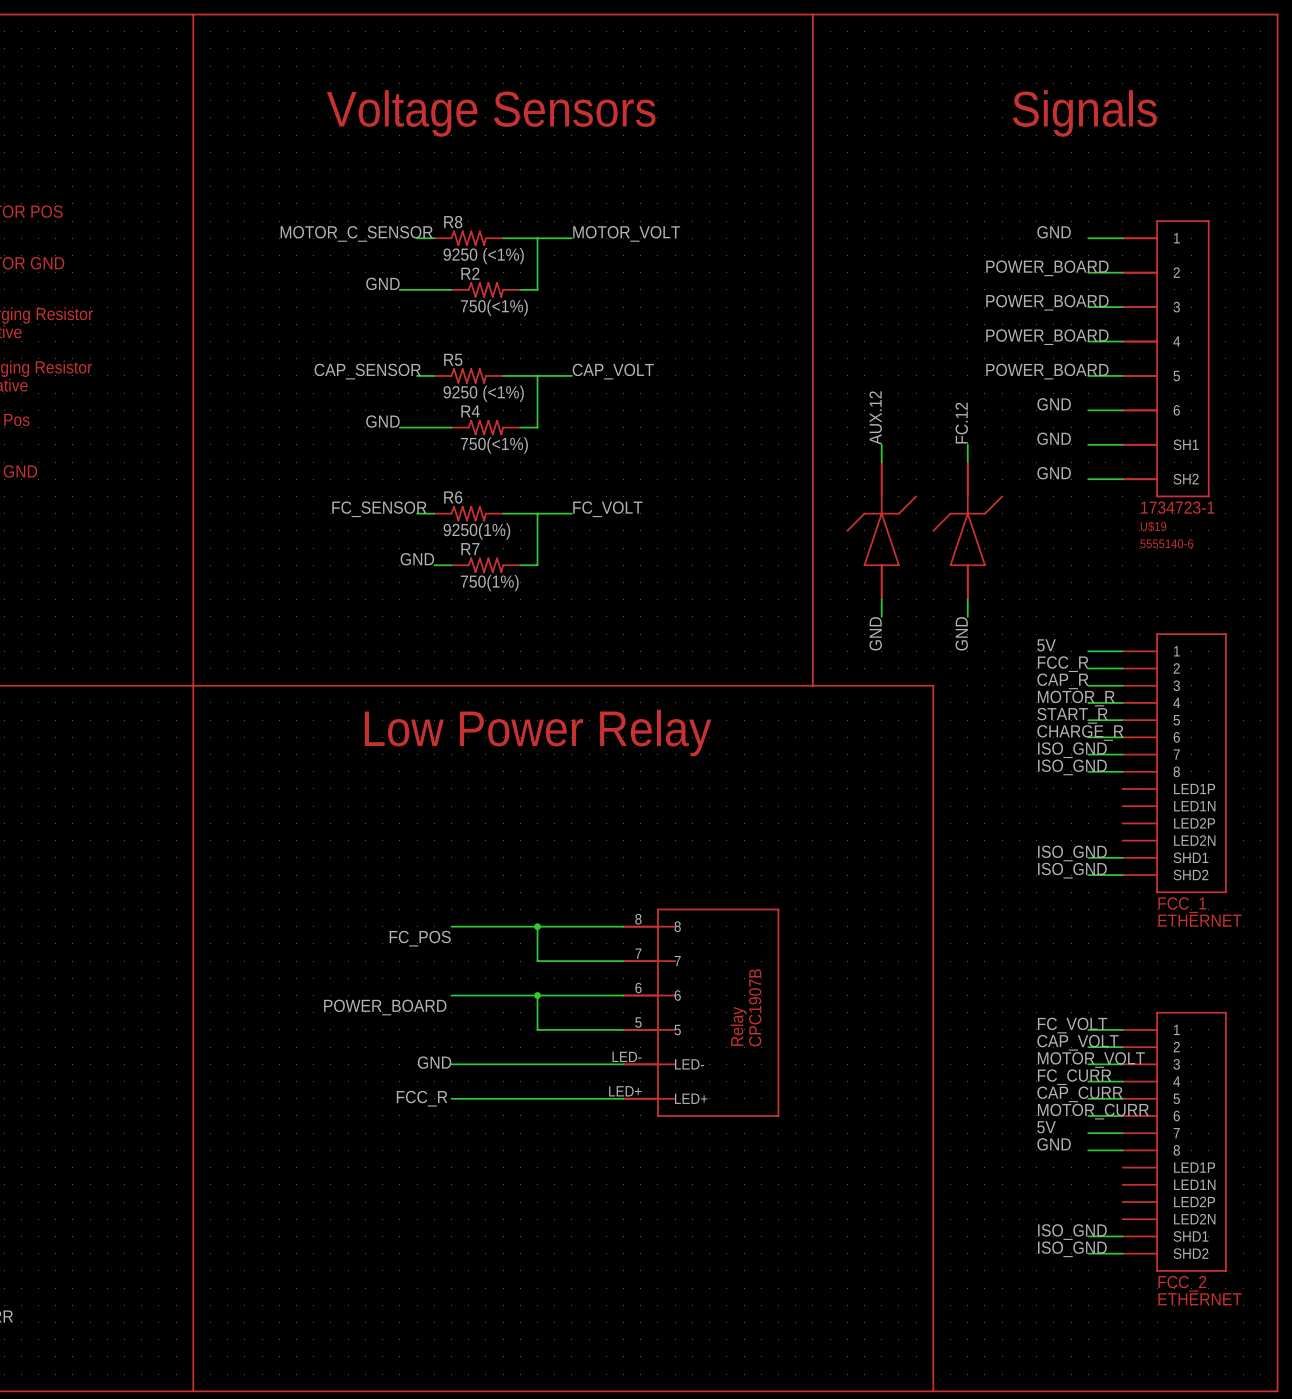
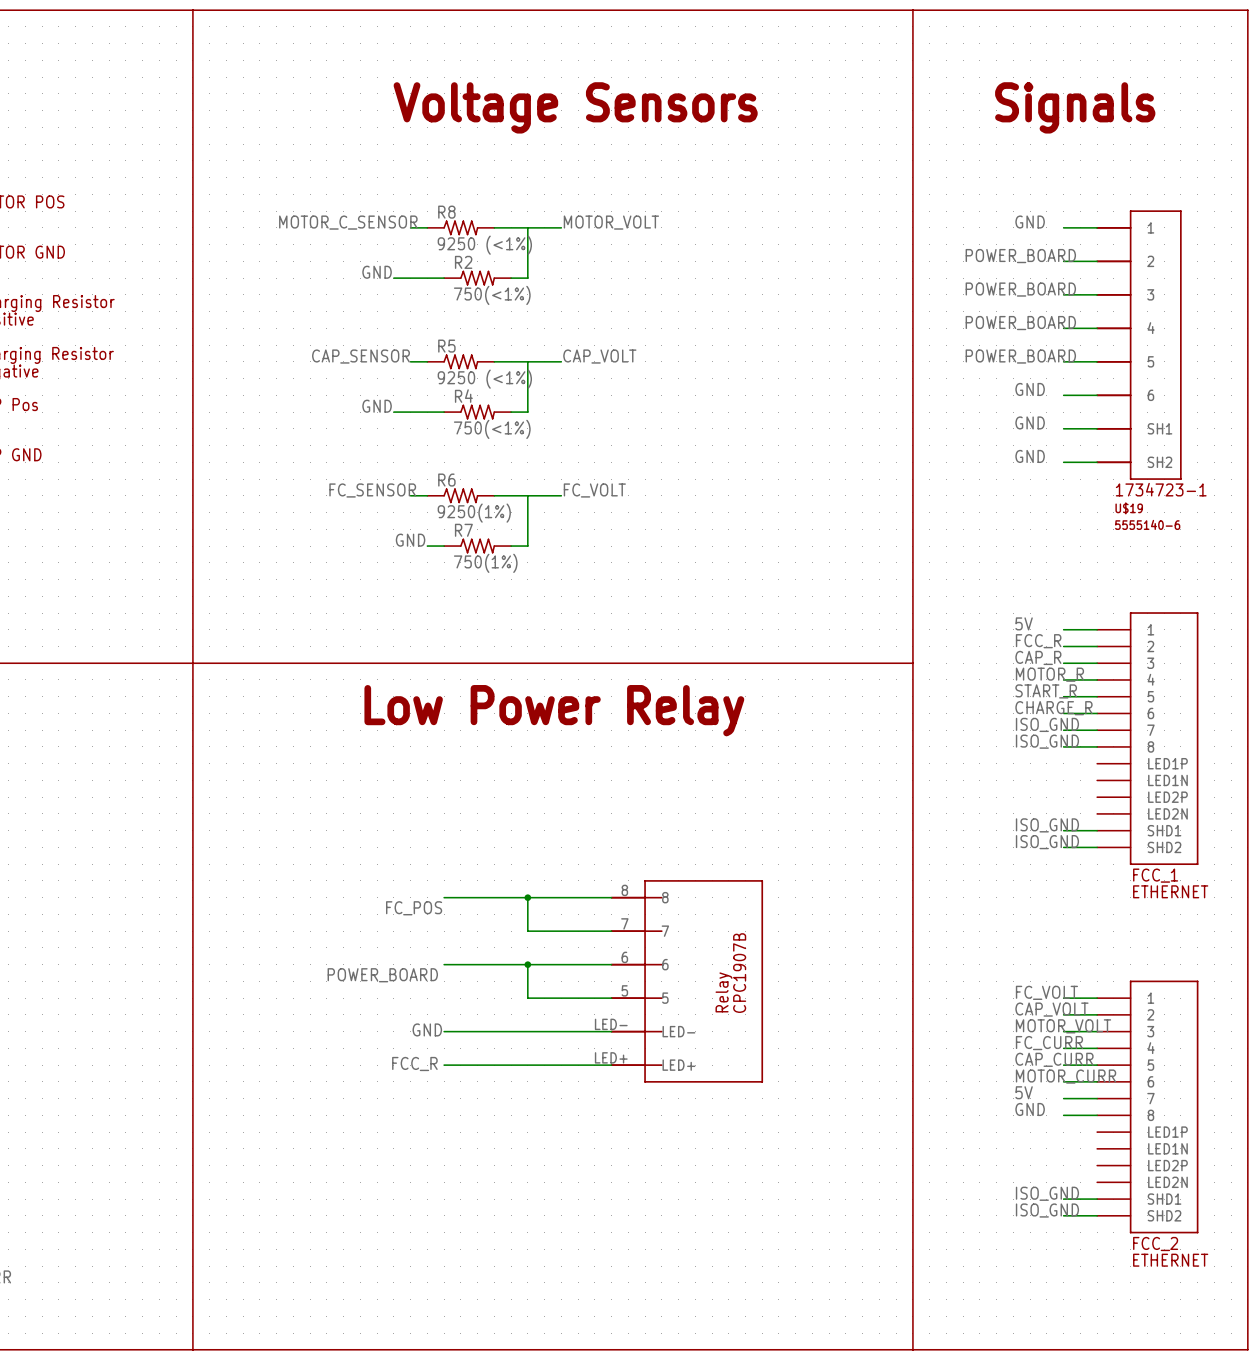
line: (812, 14) (812, 685) -> (912, 10) (912, 663)
text position: Voltage Sensors (491, 113) -> Voltage Sensors (575, 107)
label: AUX.12 (875, 418) -> none
label: FC.12 (961, 423) -> none
wire: (881, 444) (881, 462) -> none
wire: (967, 444) (967, 462) -> none
part: (881, 530) -> none
part: (967, 530) -> none
wire: (881, 599) (881, 616) -> none
wire: (967, 599) (967, 616) -> none
label: GND (875, 633) -> none
label: GND (961, 633) -> none

